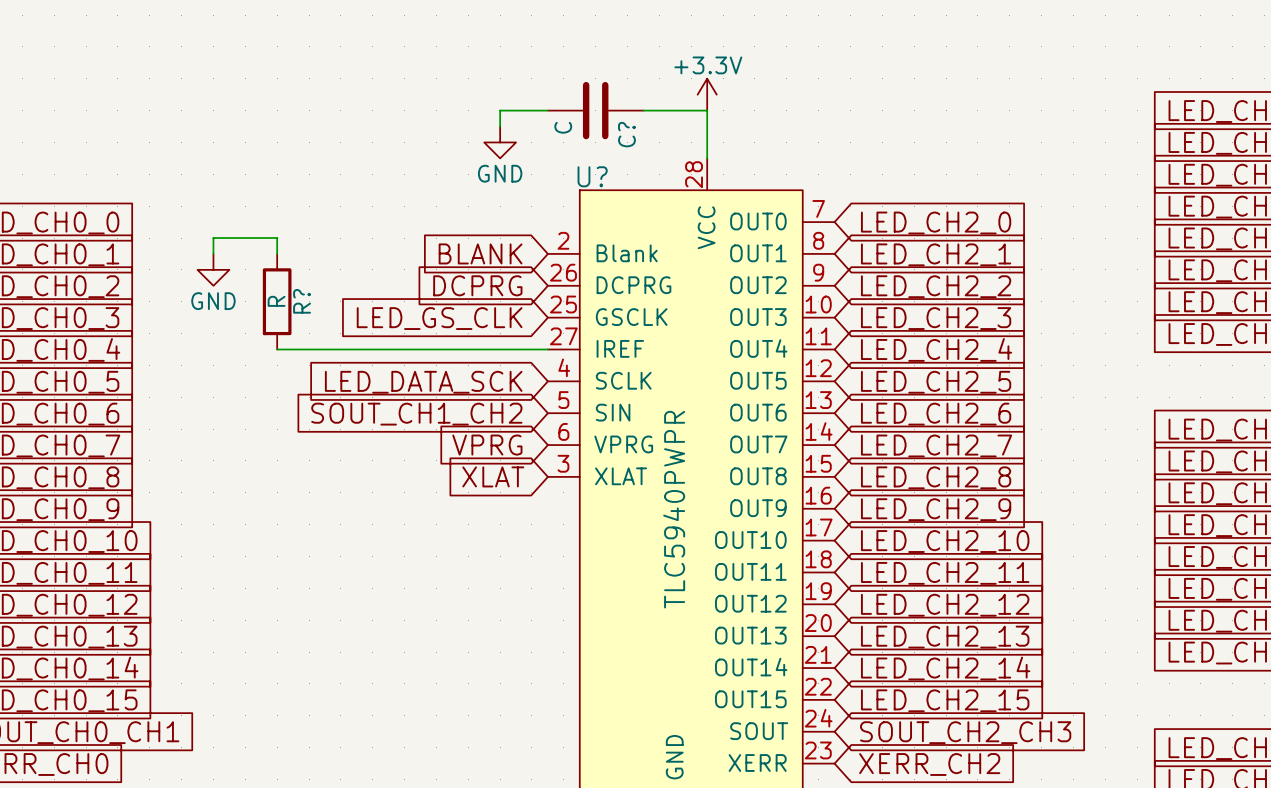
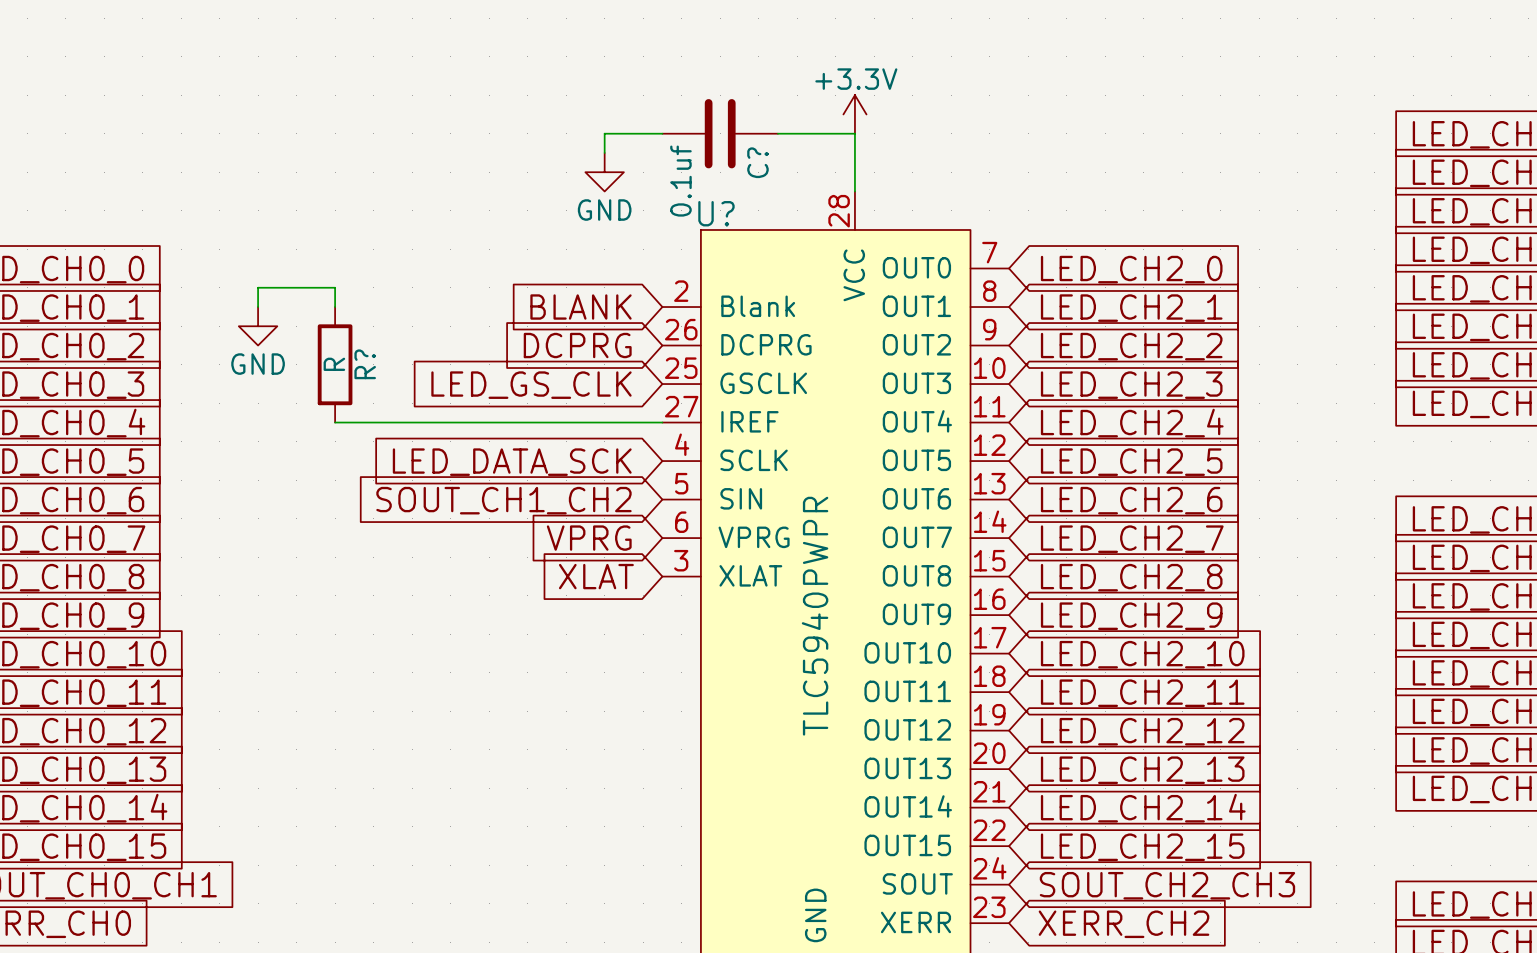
C? value: C (563, 127) -> 0.1uf (680, 181)

